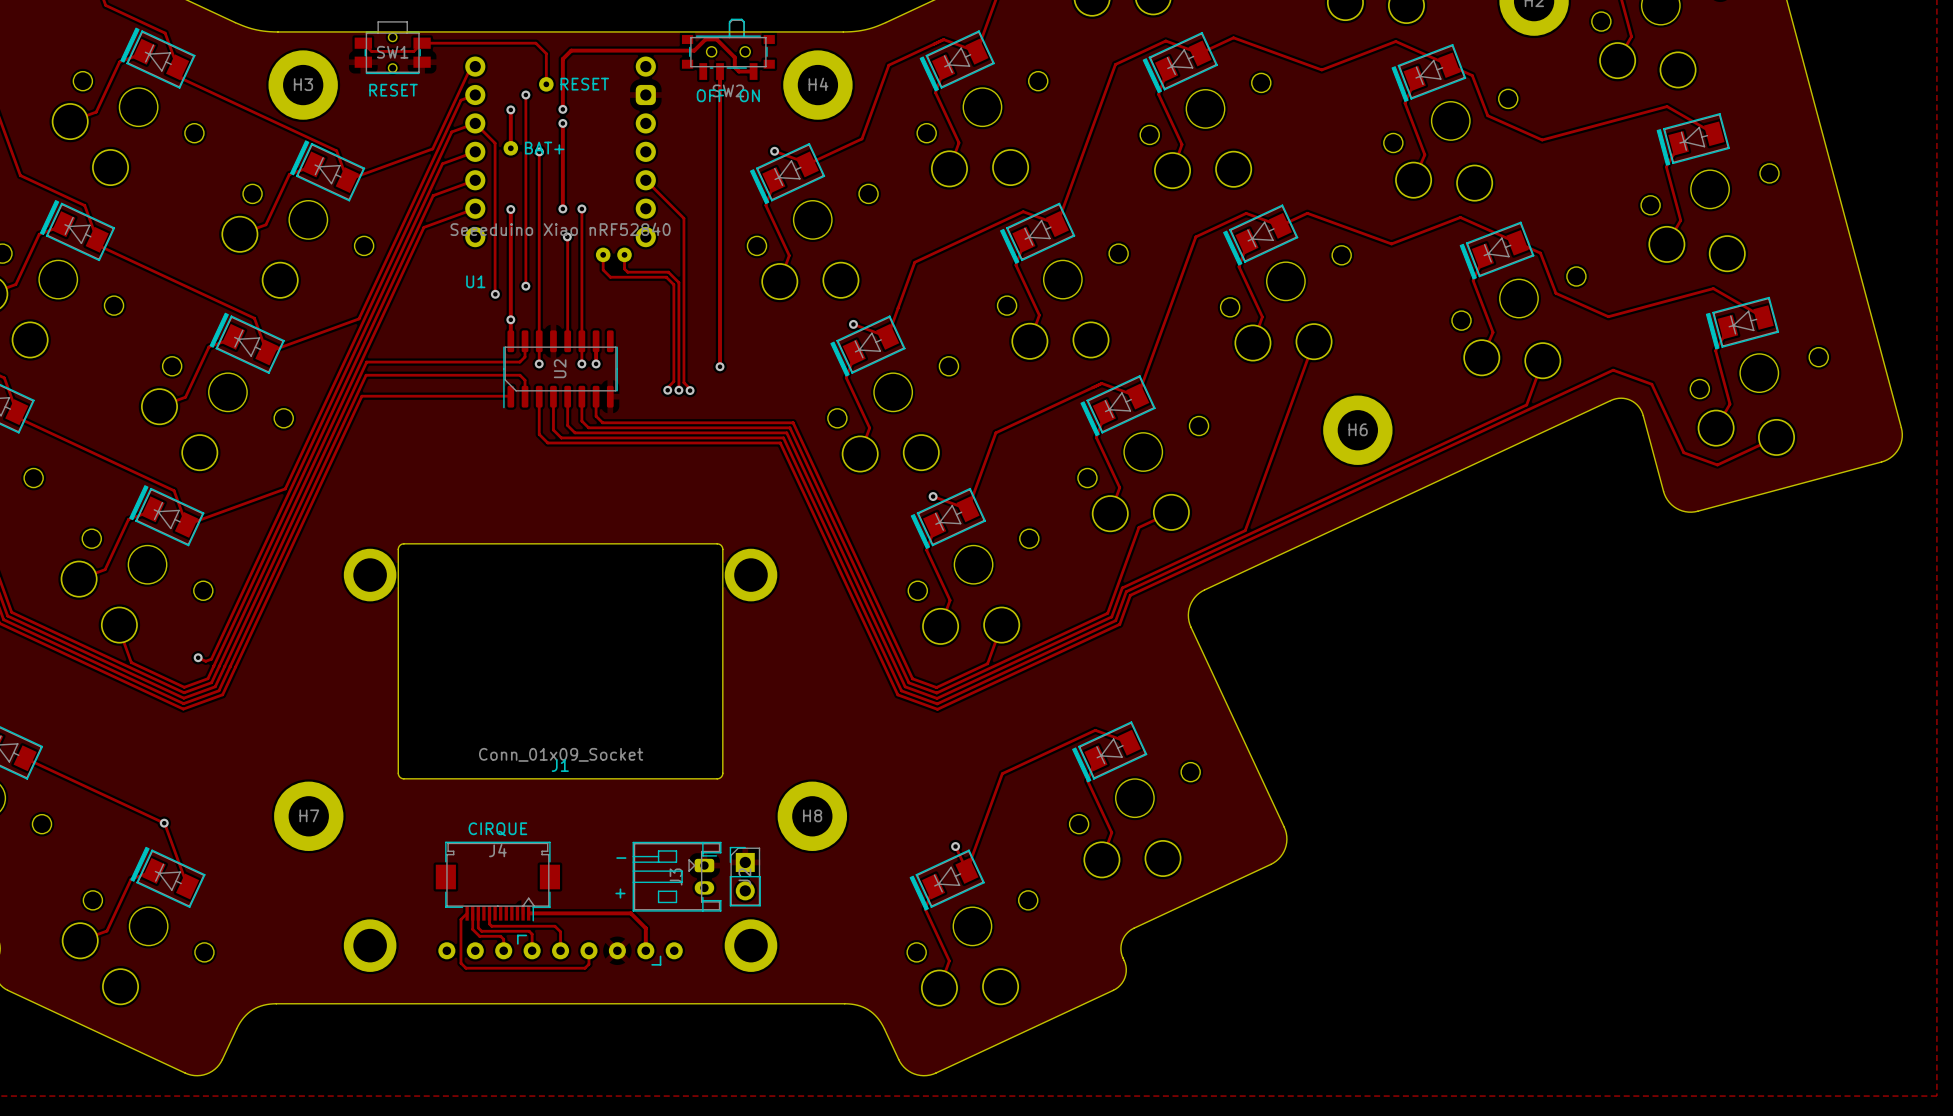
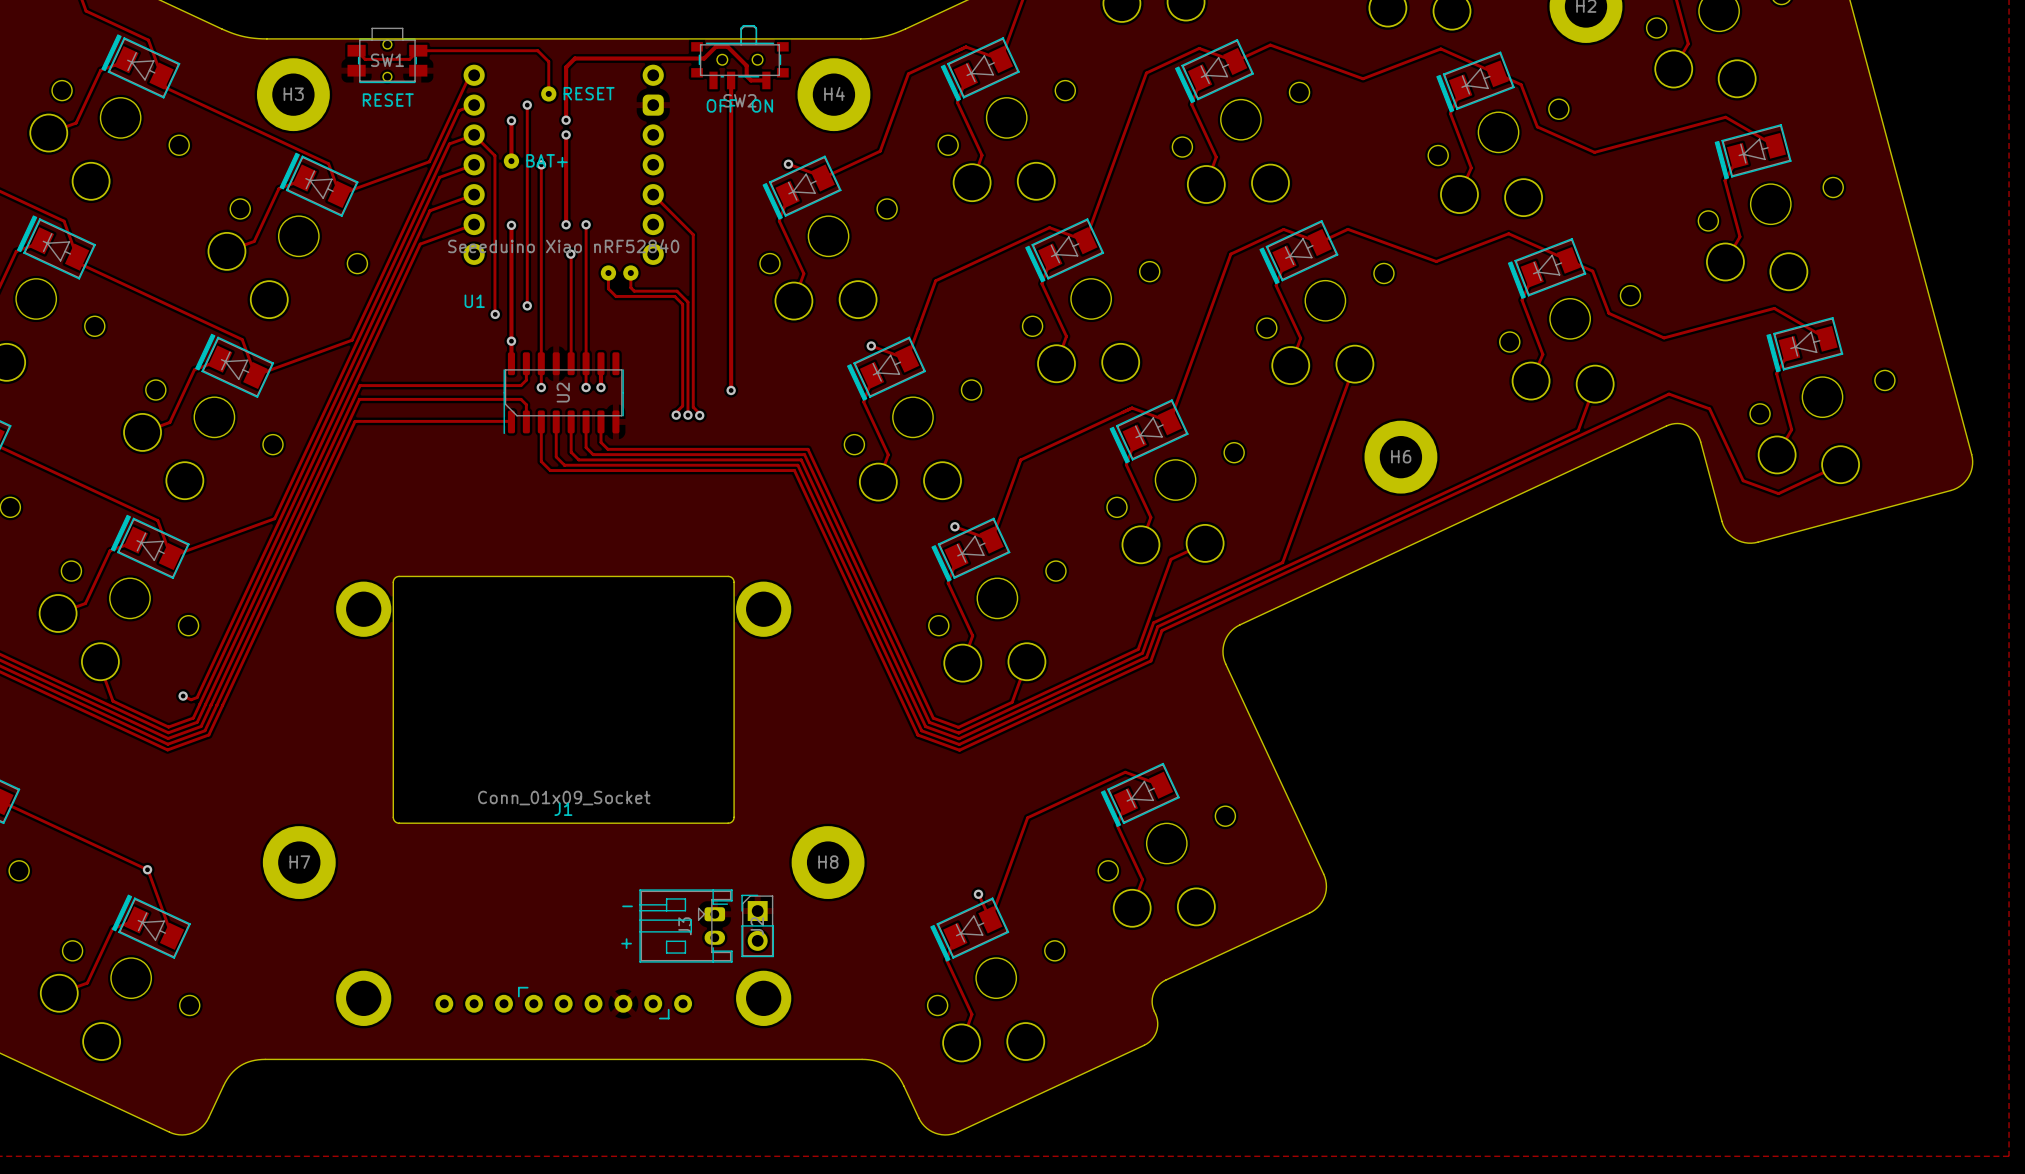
J4: (497, 881) -> none
track: (467, 913) (460, 919) (460, 963) (466, 968) (585, 968) (588, 964) (588, 950) -> none
track: (472, 913) (472, 929) (479, 936) (500, 936) (503, 939) (503, 950) -> none
track: (478, 913) (478, 927) (481, 931) (529, 931) (532, 934) (532, 950) -> none
track: (489, 913) (489, 924) (491, 926) (554, 926) (560, 931) (560, 950) -> none
track: (528, 913) (630, 913) (645, 928) (645, 950) -> none

